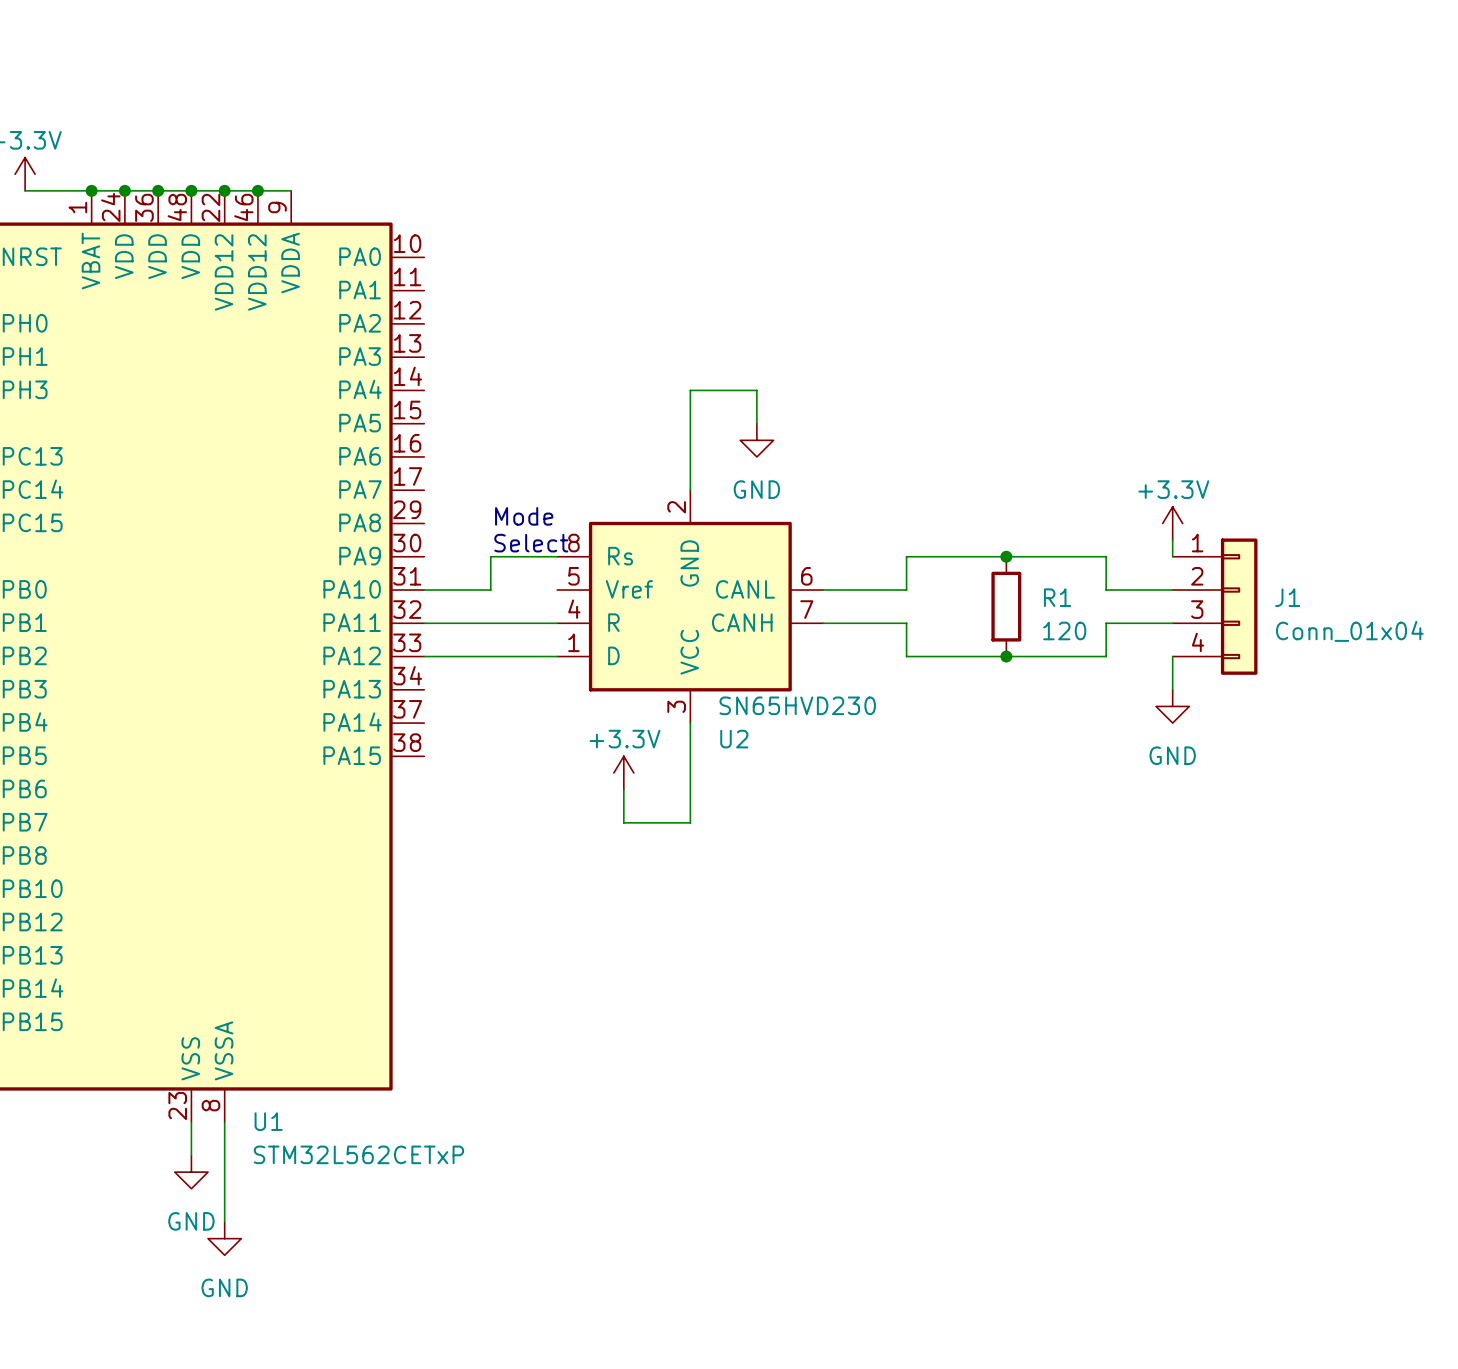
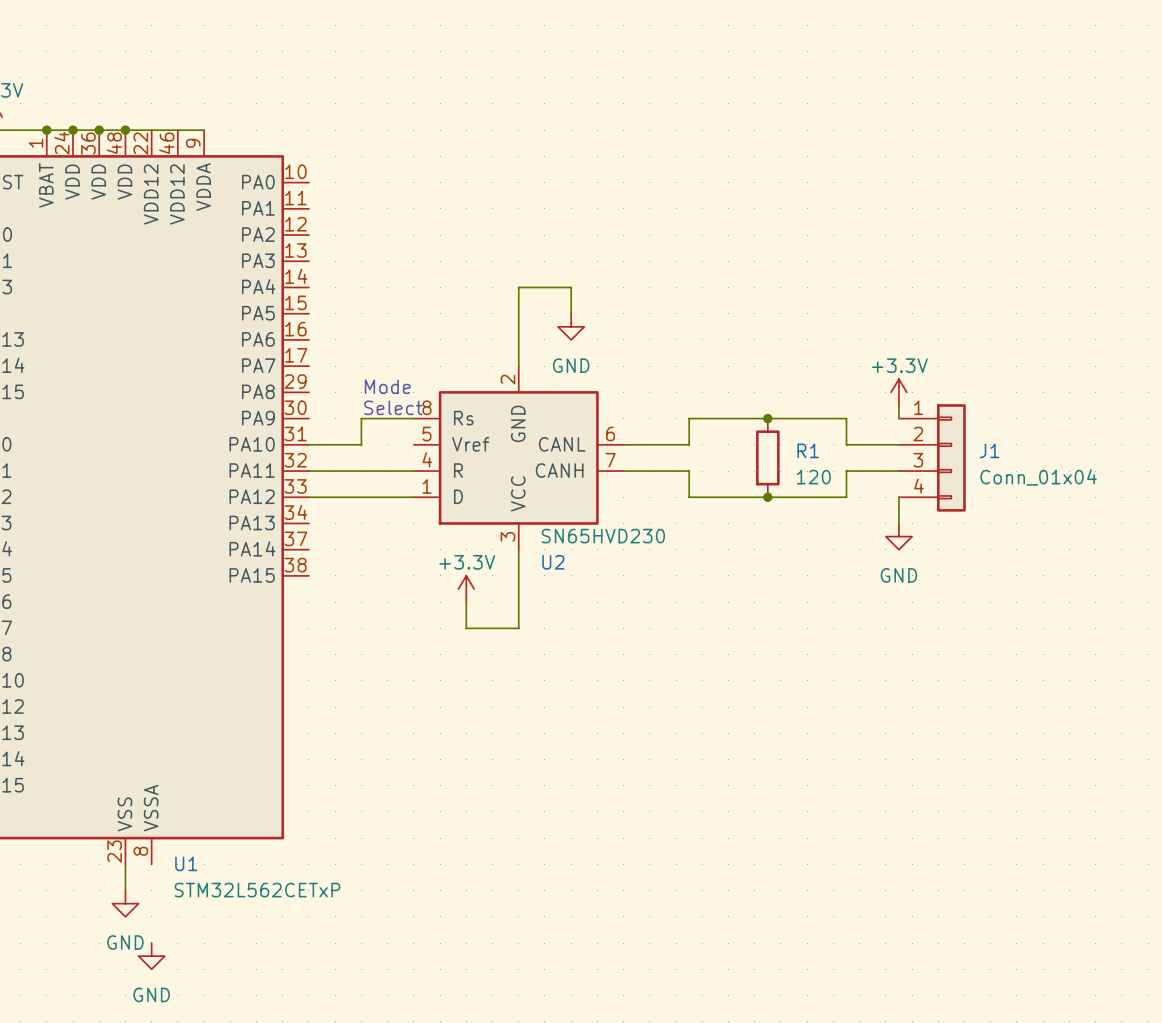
junction: (224, 190) -> none
junction: (257, 190) -> none
wire: (224, 1122) (224, 1222) -> none

